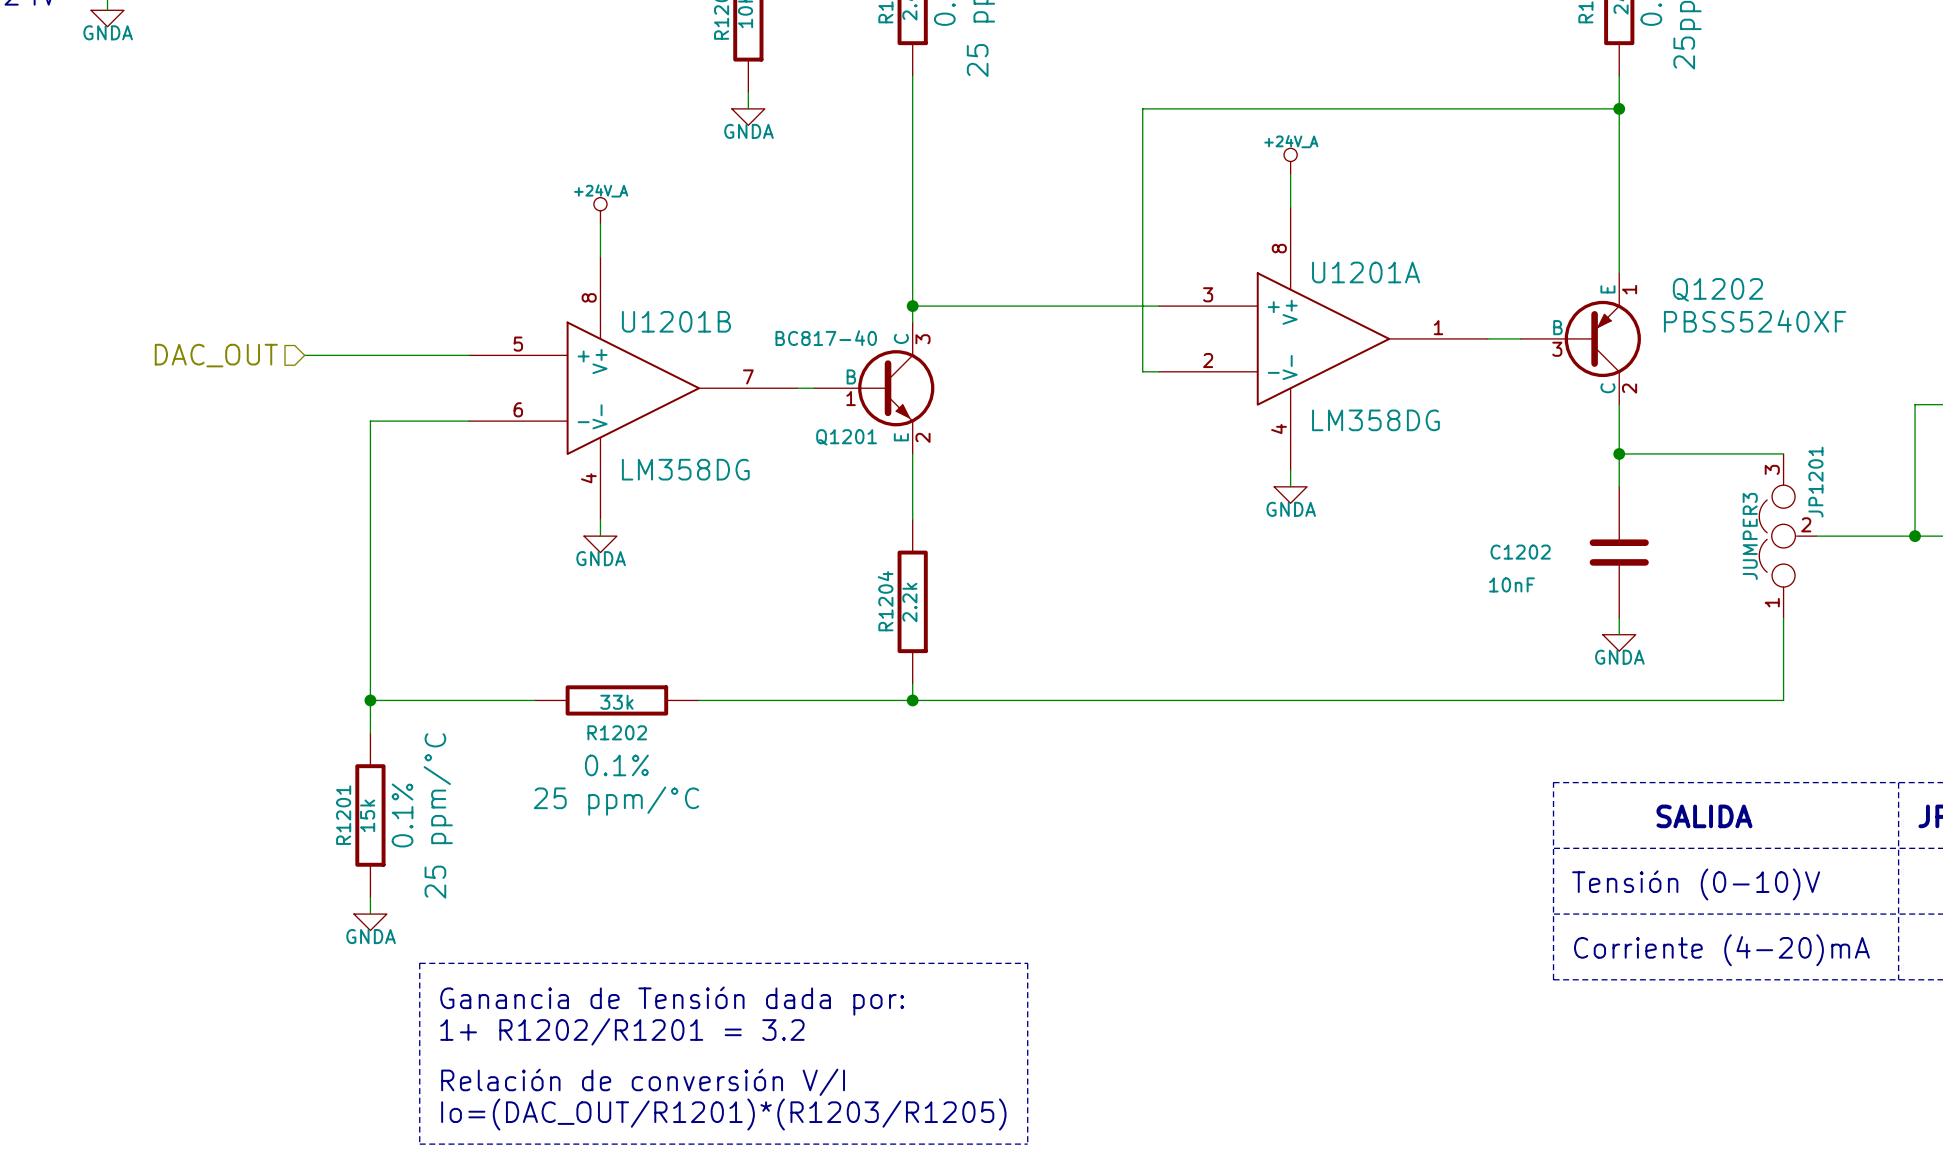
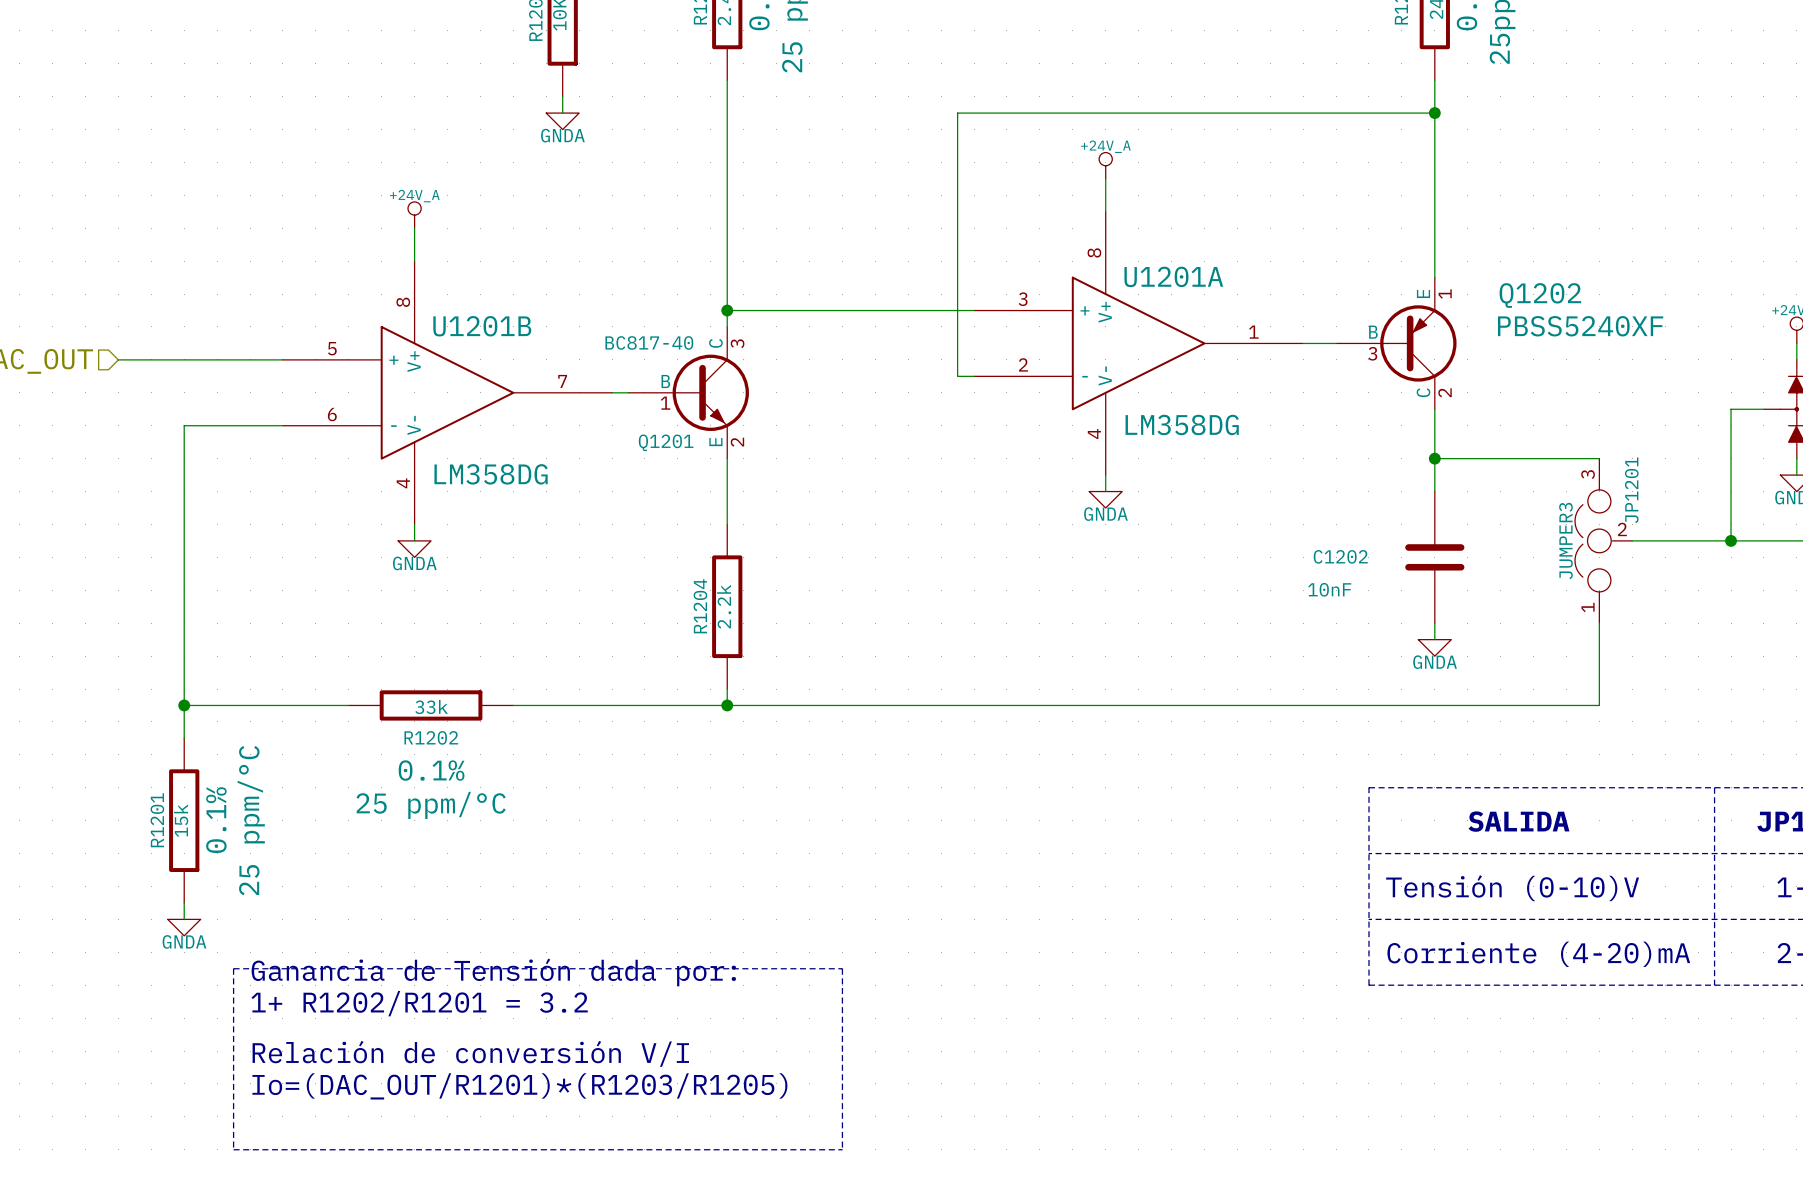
text: none -> Ganancia de Tensión dada por: (493, 972)
text: Ganancia de Tensión dada por: (672, 1001) -> 1+ R1202/R1201 = 3.2 (419, 1003)
text: 1+ R1202/R1201 = 3.2 (622, 1031) -> none
text: none -> Relación de conversión V/I (470, 1053)
text: Relación de conversión V/I (643, 1082) -> Io=(DAC_OUT/R1201)*(R1203/R1205) (519, 1086)
text: Io=(DAC_OUT/R1201)*(R1203/R1205) (723, 1114) -> none

